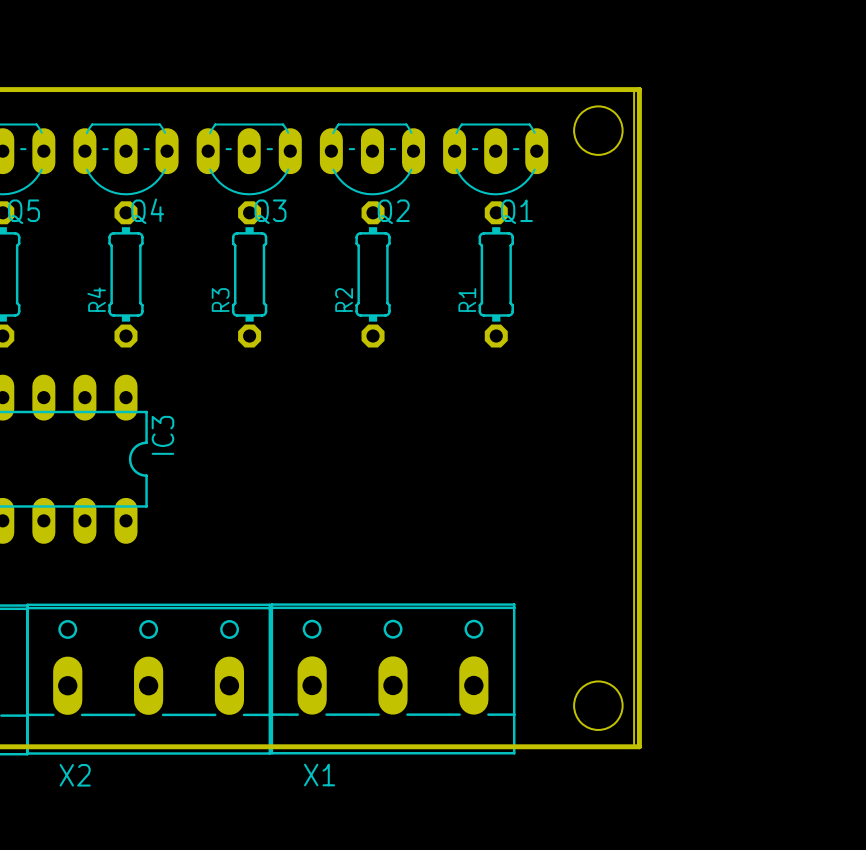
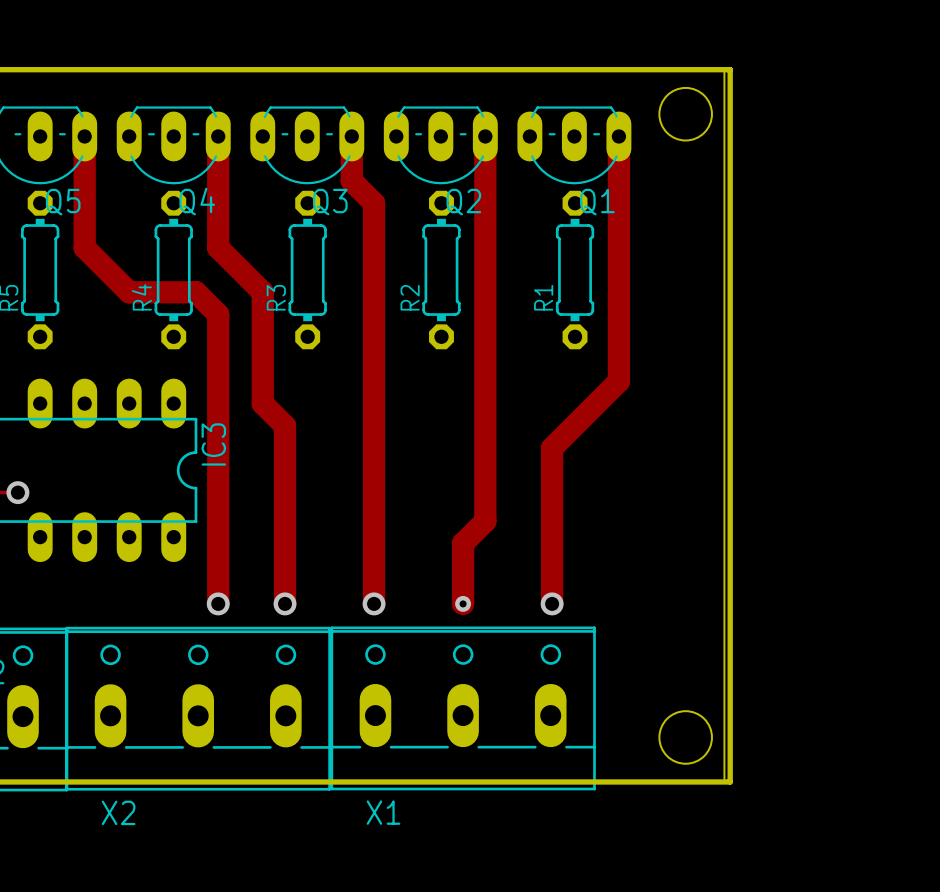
track: none -> (84, 136) (84, 247) (129, 292) (195, 292) (218, 314) (218, 603)
track: none -> (218, 136) (218, 247) (262, 292) (262, 403) (285, 425) (285, 603)
track: none -> (351, 136) (351, 180) (374, 203) (374, 603)
track: none -> (485, 136) (485, 521) (463, 543) (463, 603)
track: none -> (618, 136) (618, 381) (552, 448) (552, 603)
via: none -> (218, 603)
via: none -> (285, 603)
via: none -> (374, 603)
via: none -> (463, 603)
via: none -> (552, 603)

